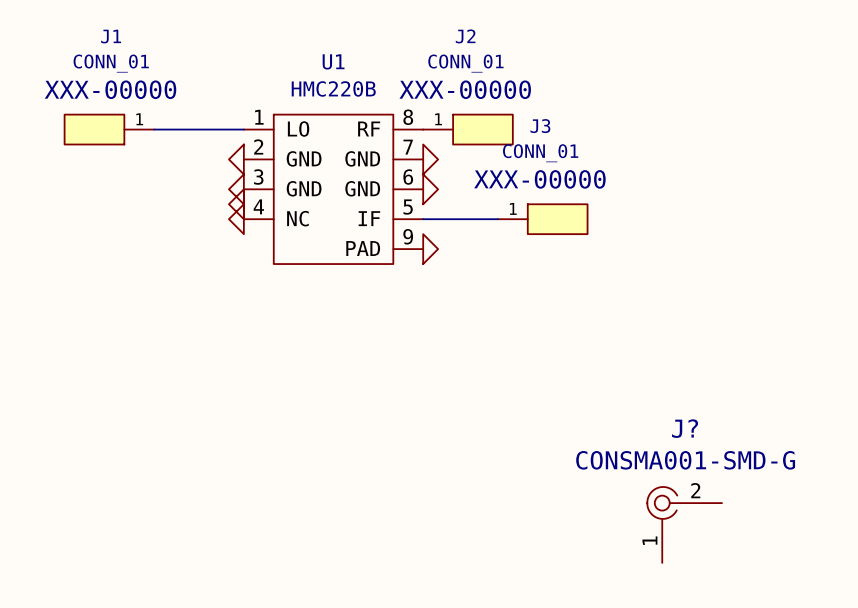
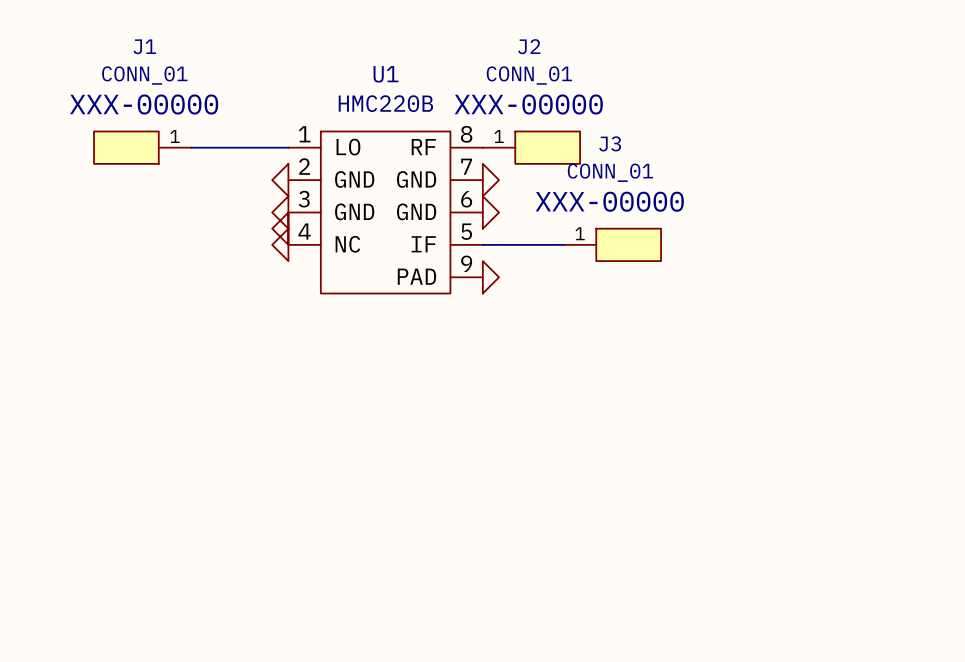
J?: CONSMA001-SMD-G (684, 524) -> none

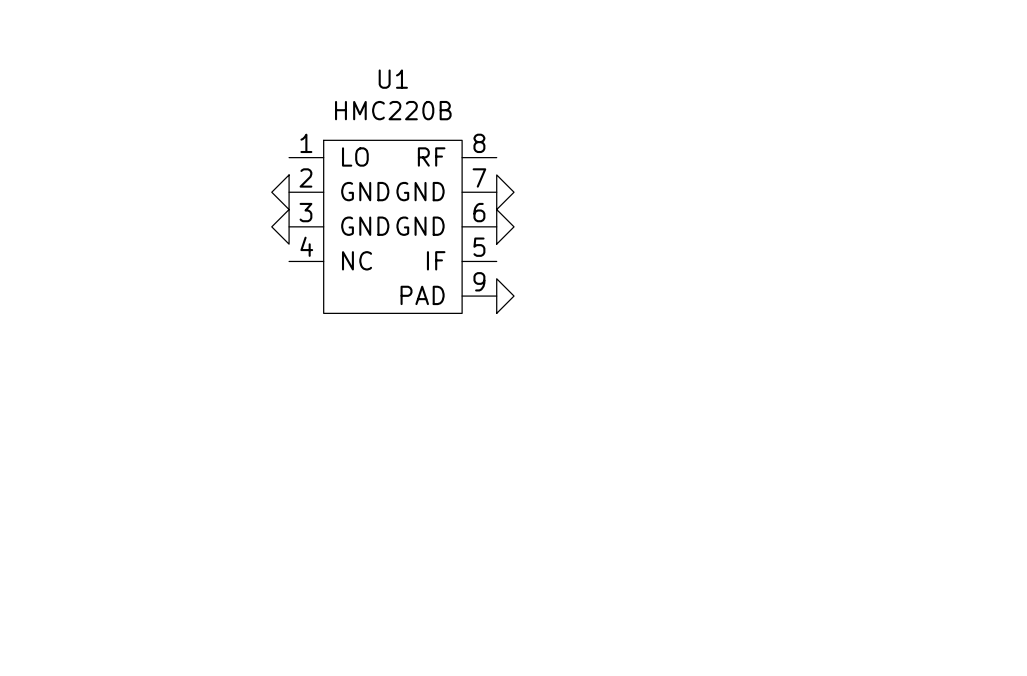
J1: CONN_01 (142, 147) -> none
wire: (191, 147) (288, 147) -> none
J2: CONN_01 (531, 147) -> none
power symbol: (280, 228) -> none
power symbol: (280, 244) -> none
wire: (482, 244) (563, 244) -> none
J3: CONN_01 (612, 244) -> none

